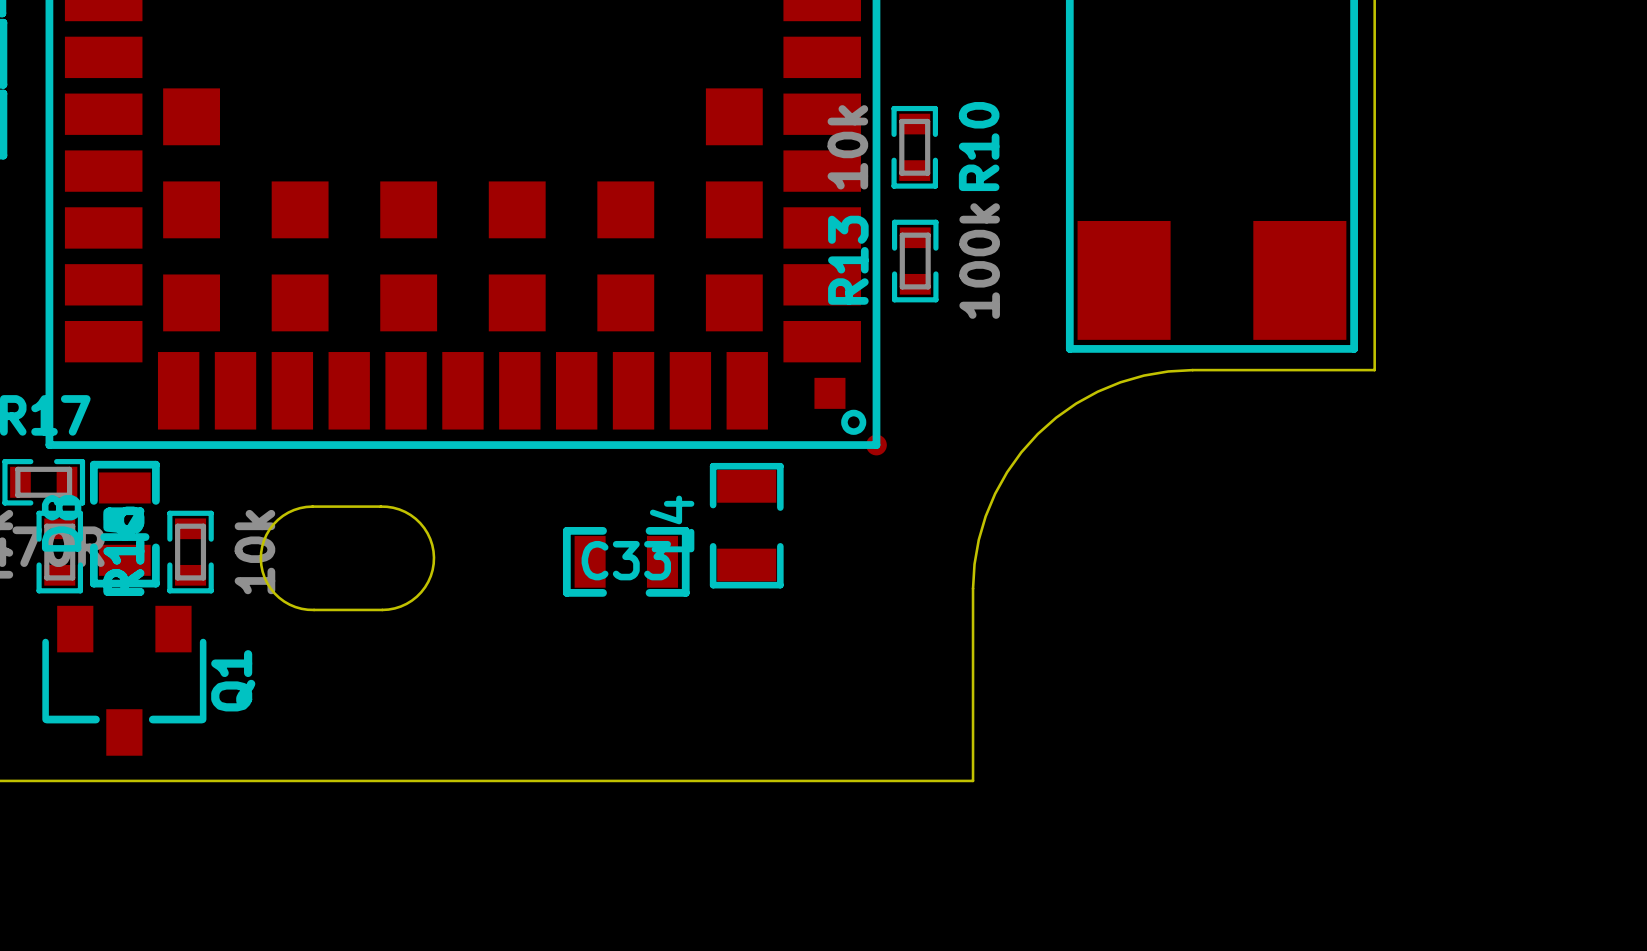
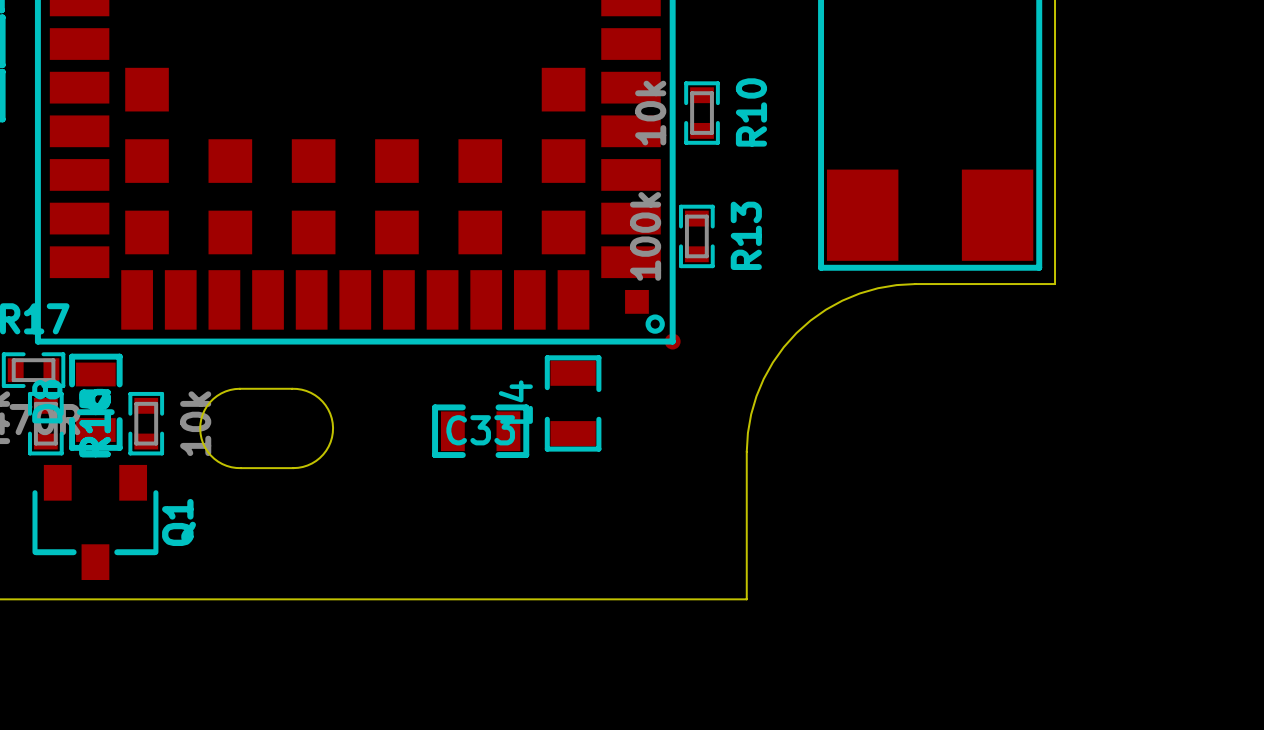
R13 name position: R13 (848, 260) -> R13 (746, 235)
R13 position: (915, 261) -> (696, 236)
R13 value position: 100k (979, 261) -> 100k (645, 236)

